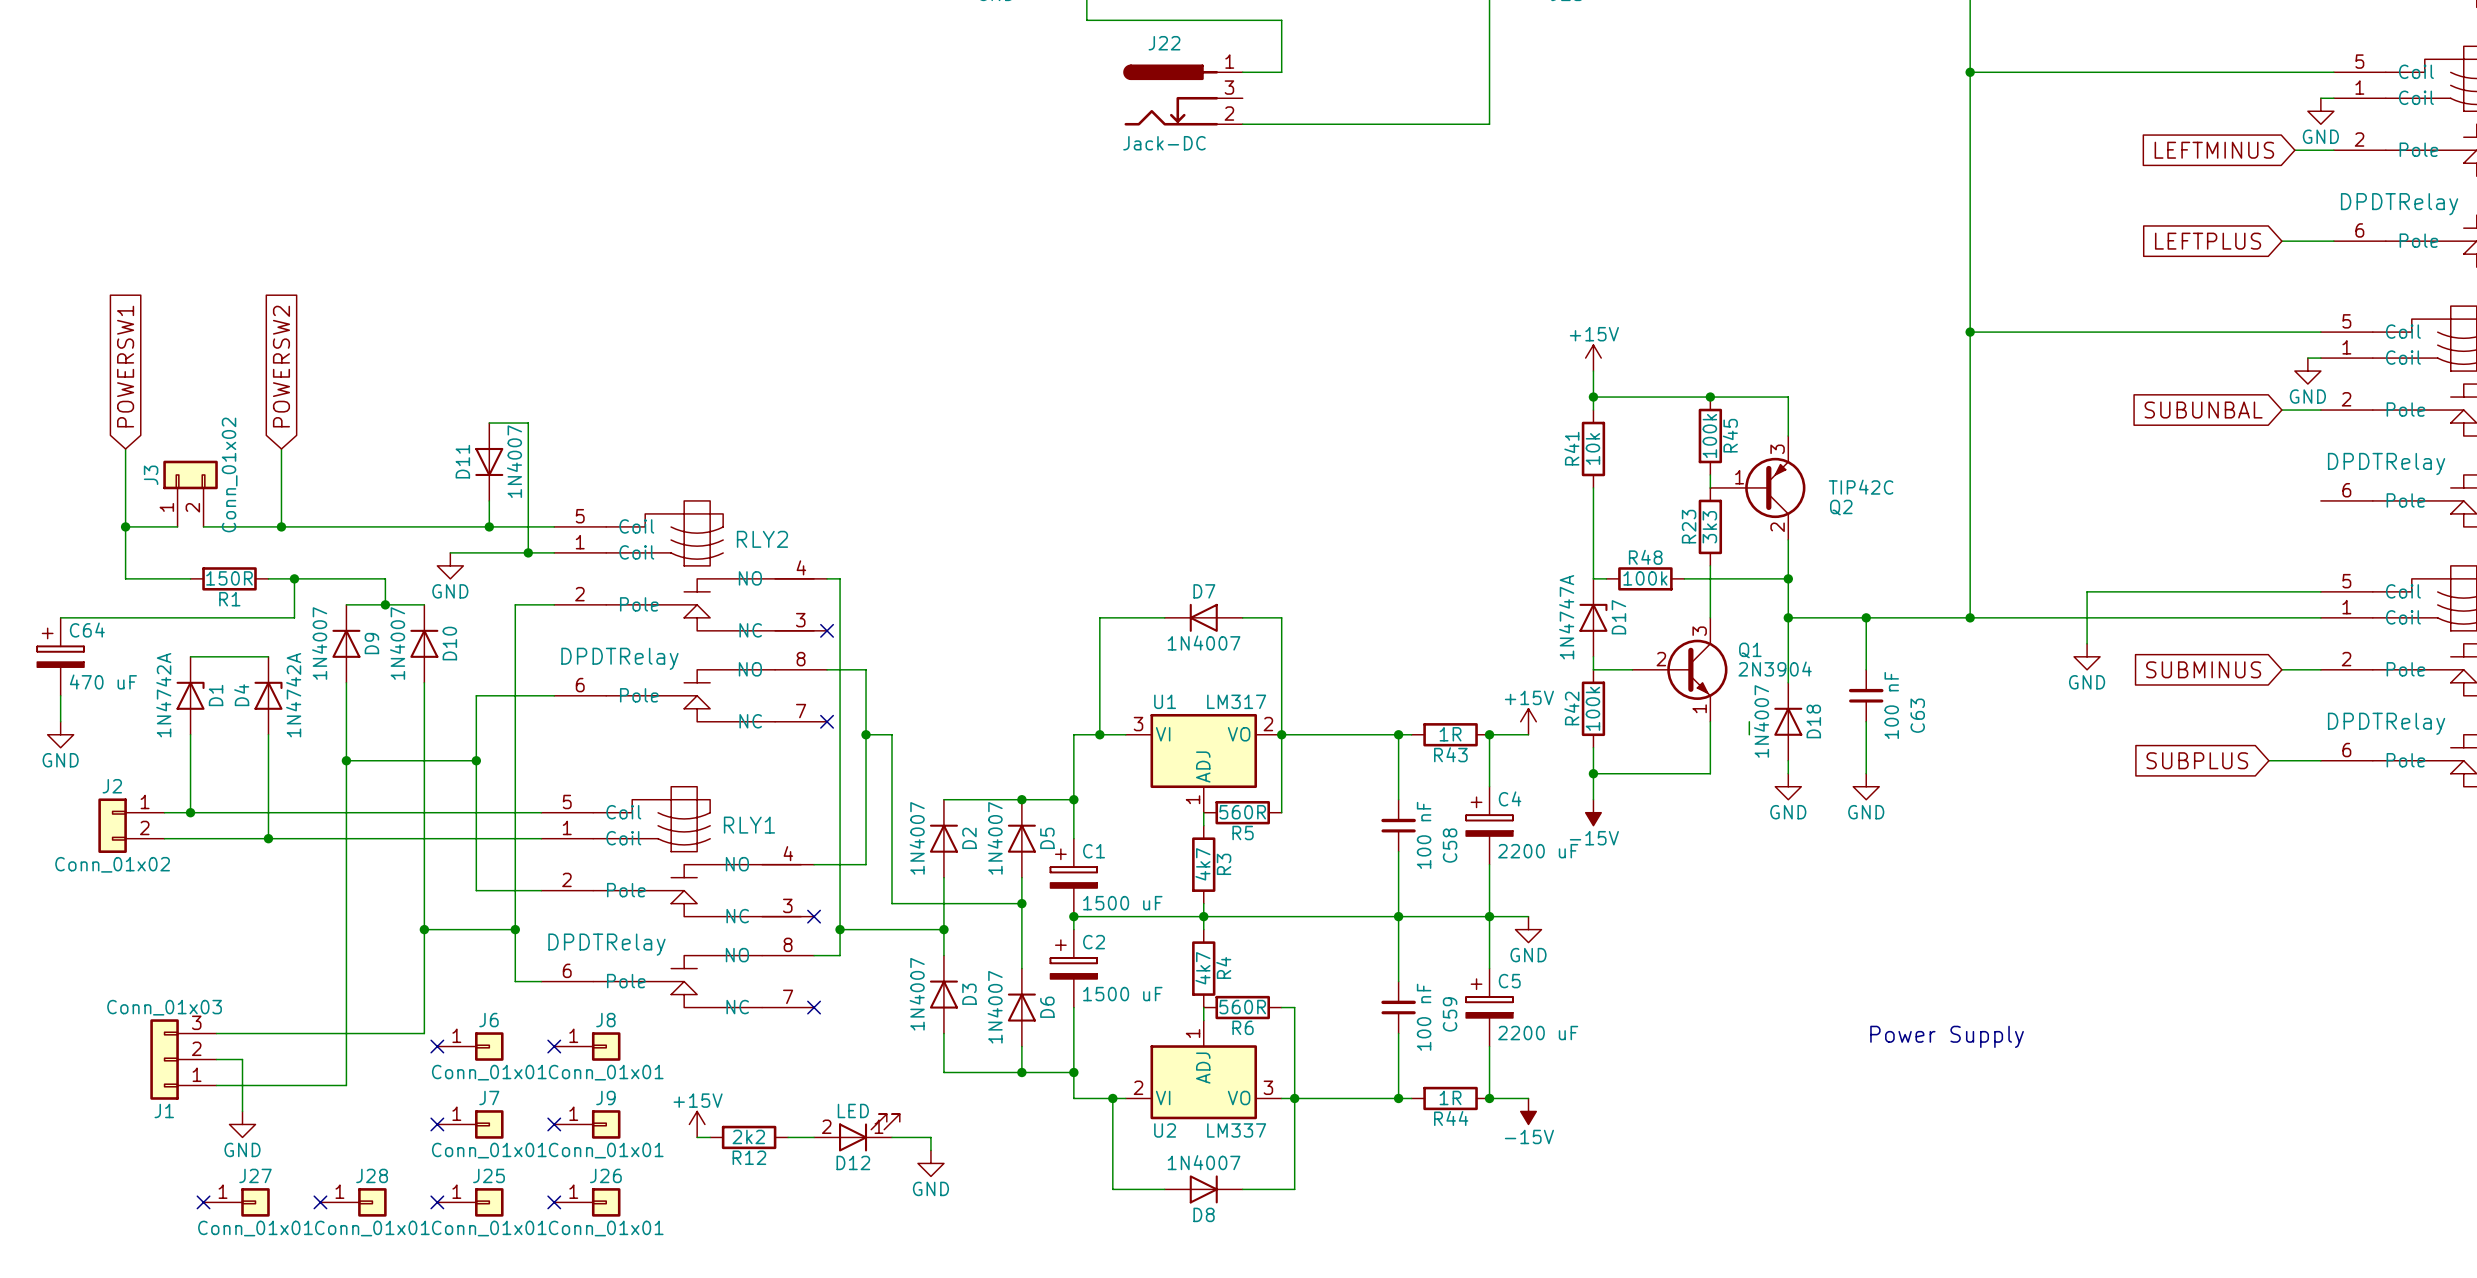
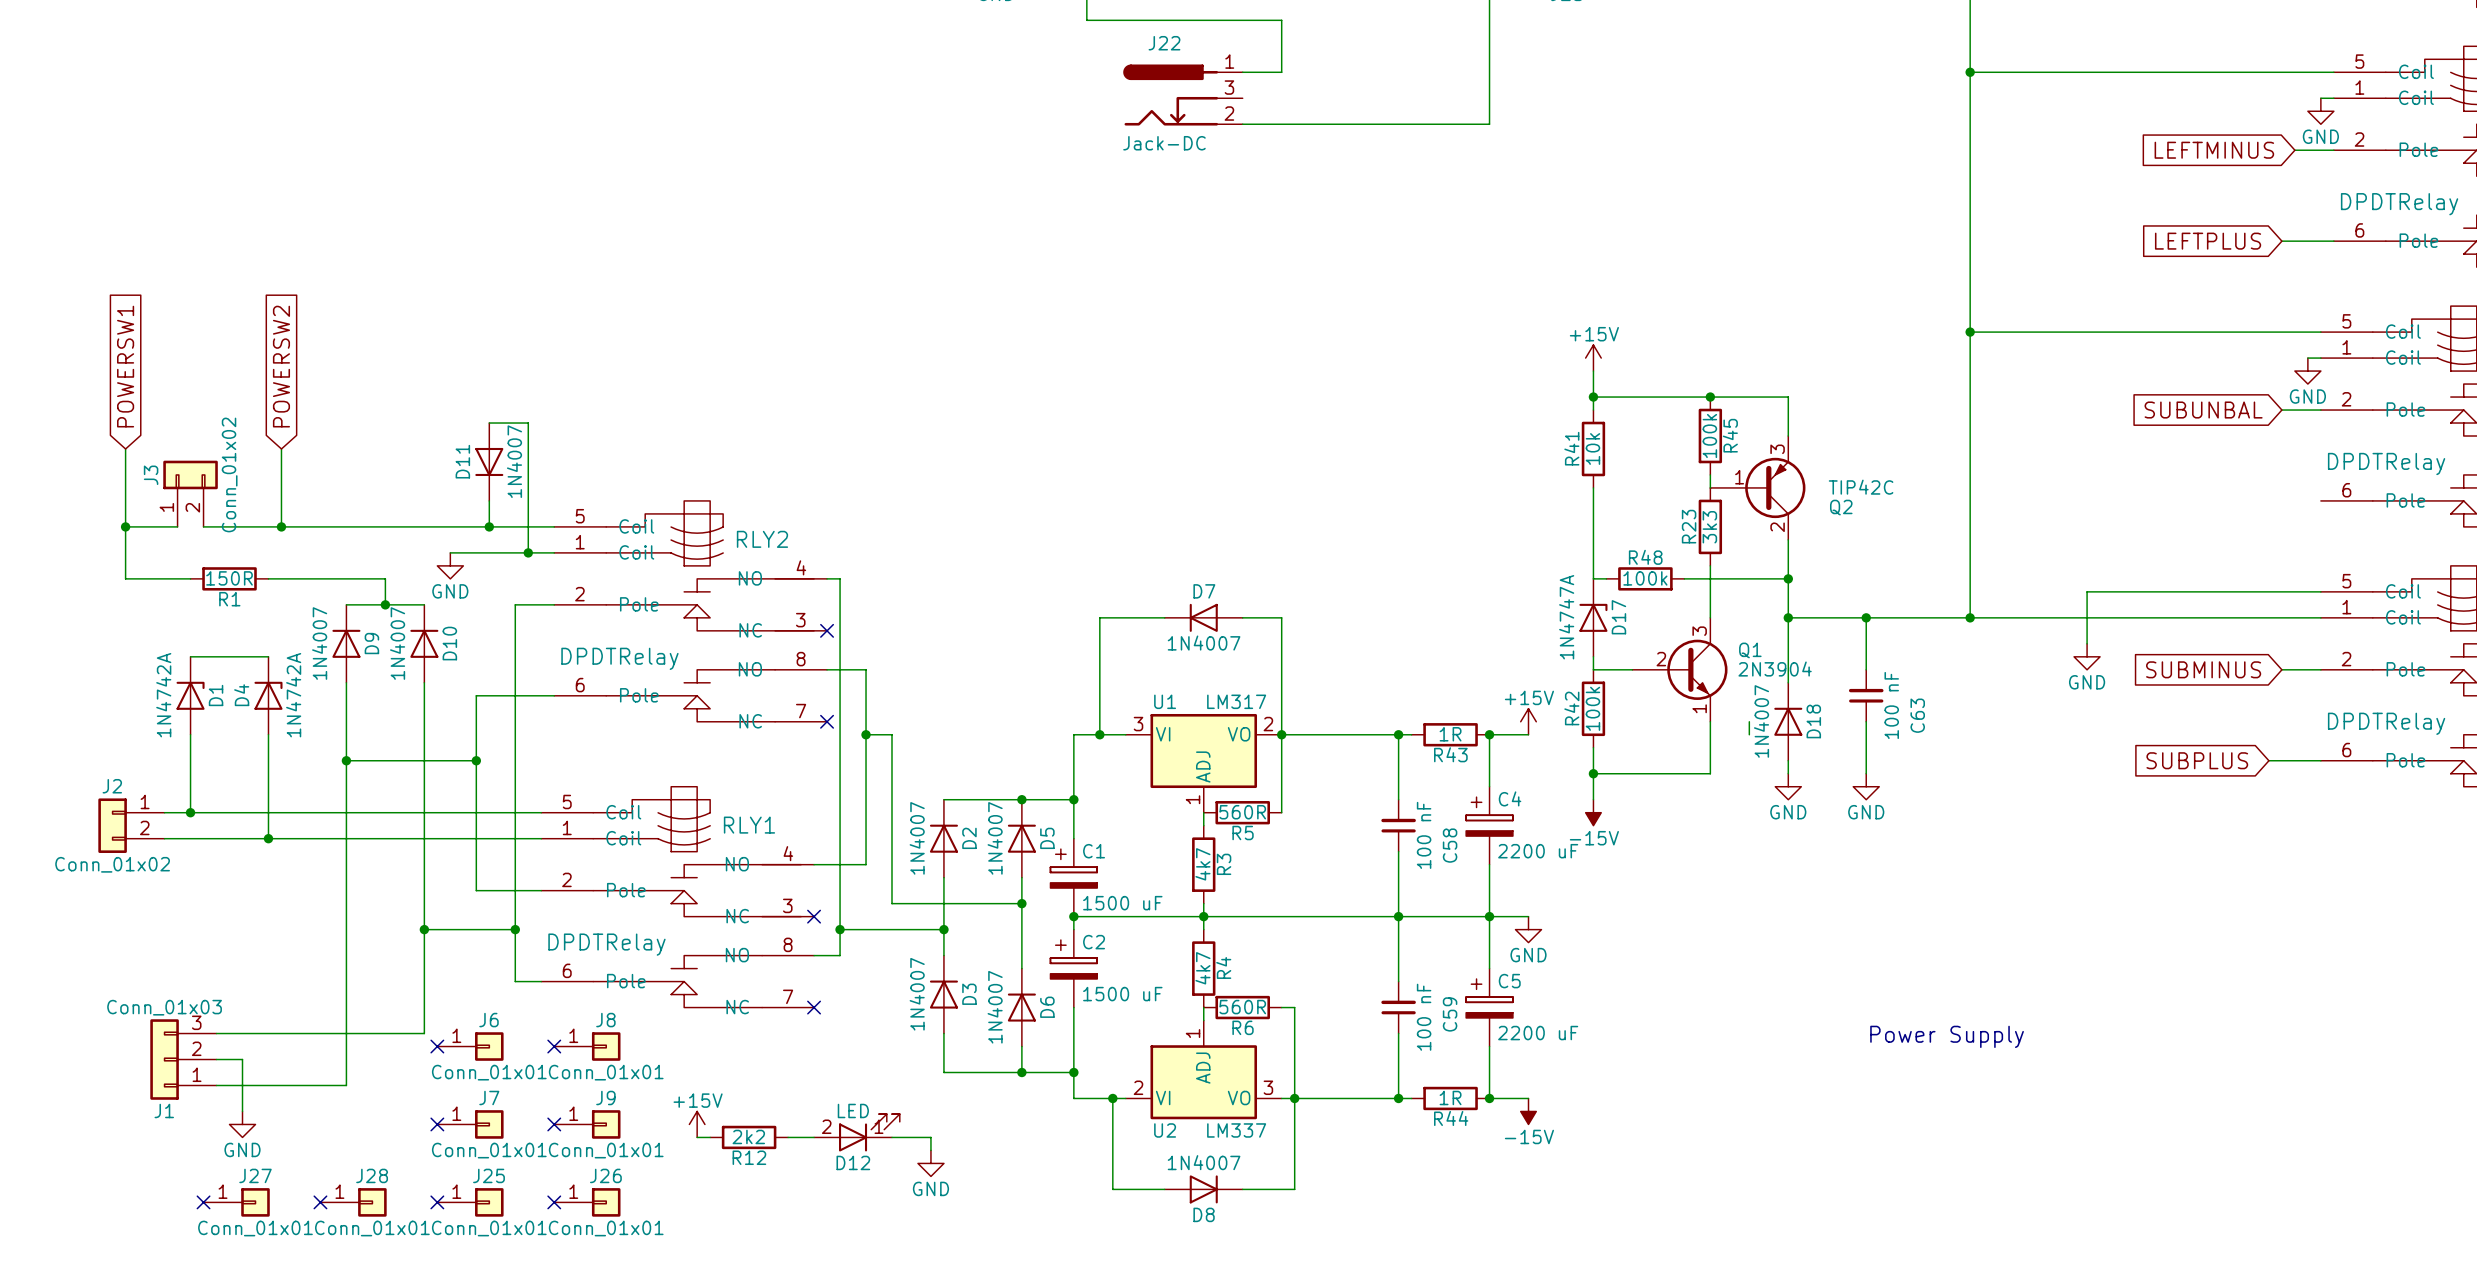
wire: (294, 578) (294, 617) (60, 617) -> none
junction: (294, 578) -> none
C64: 470 uF (60, 656) -> none
wire: (60, 695) (60, 721) -> none
power symbol: GND (60, 734) -> none

